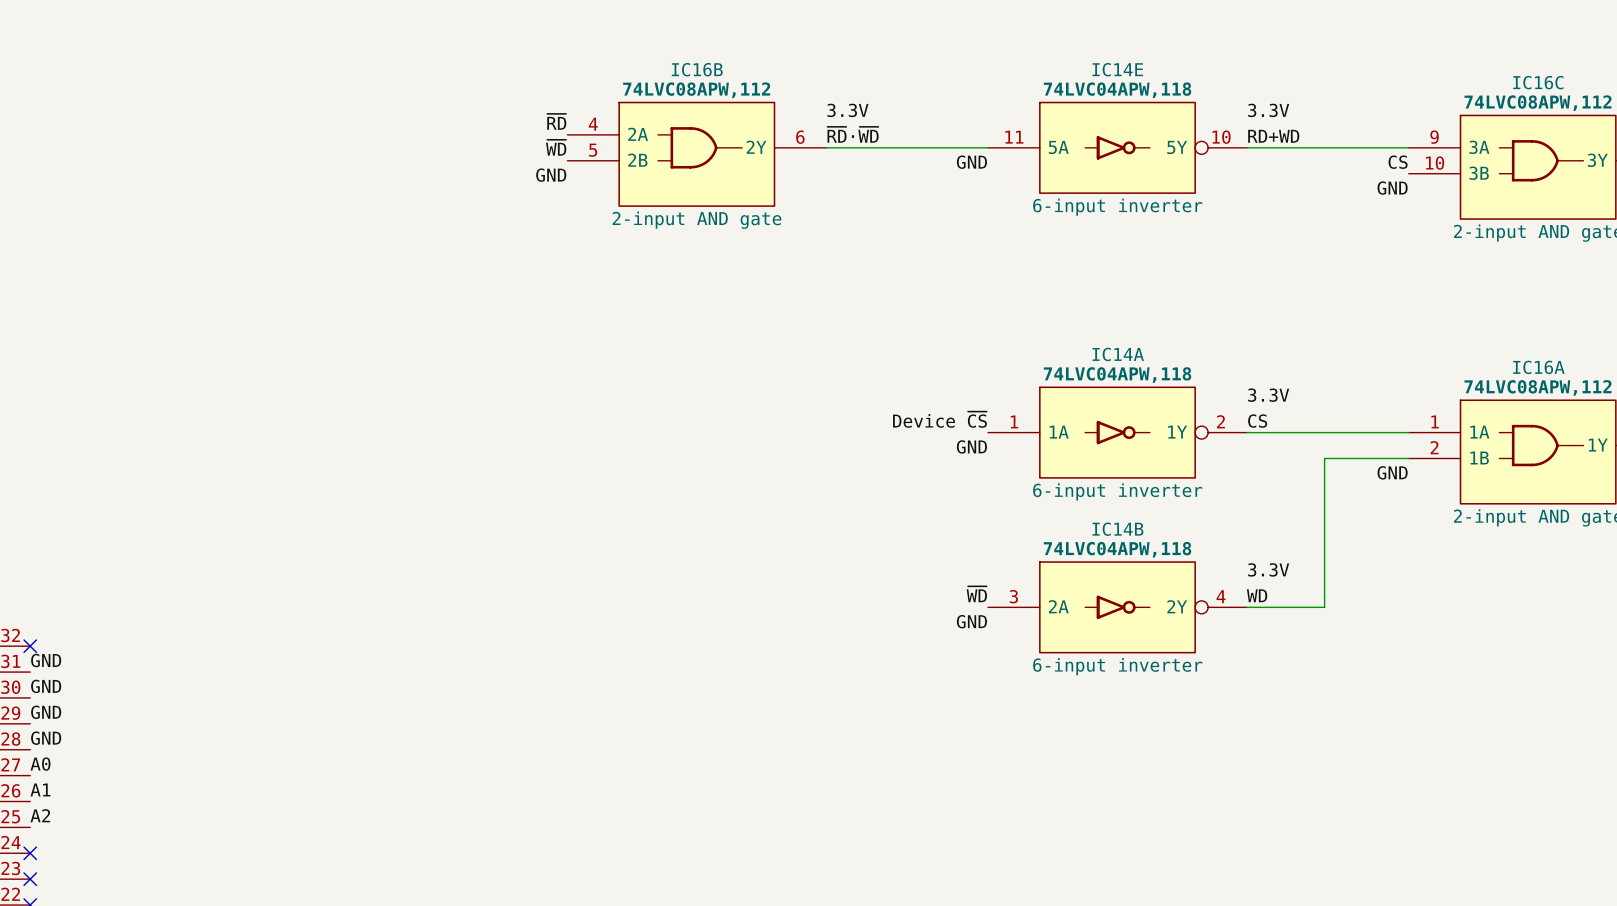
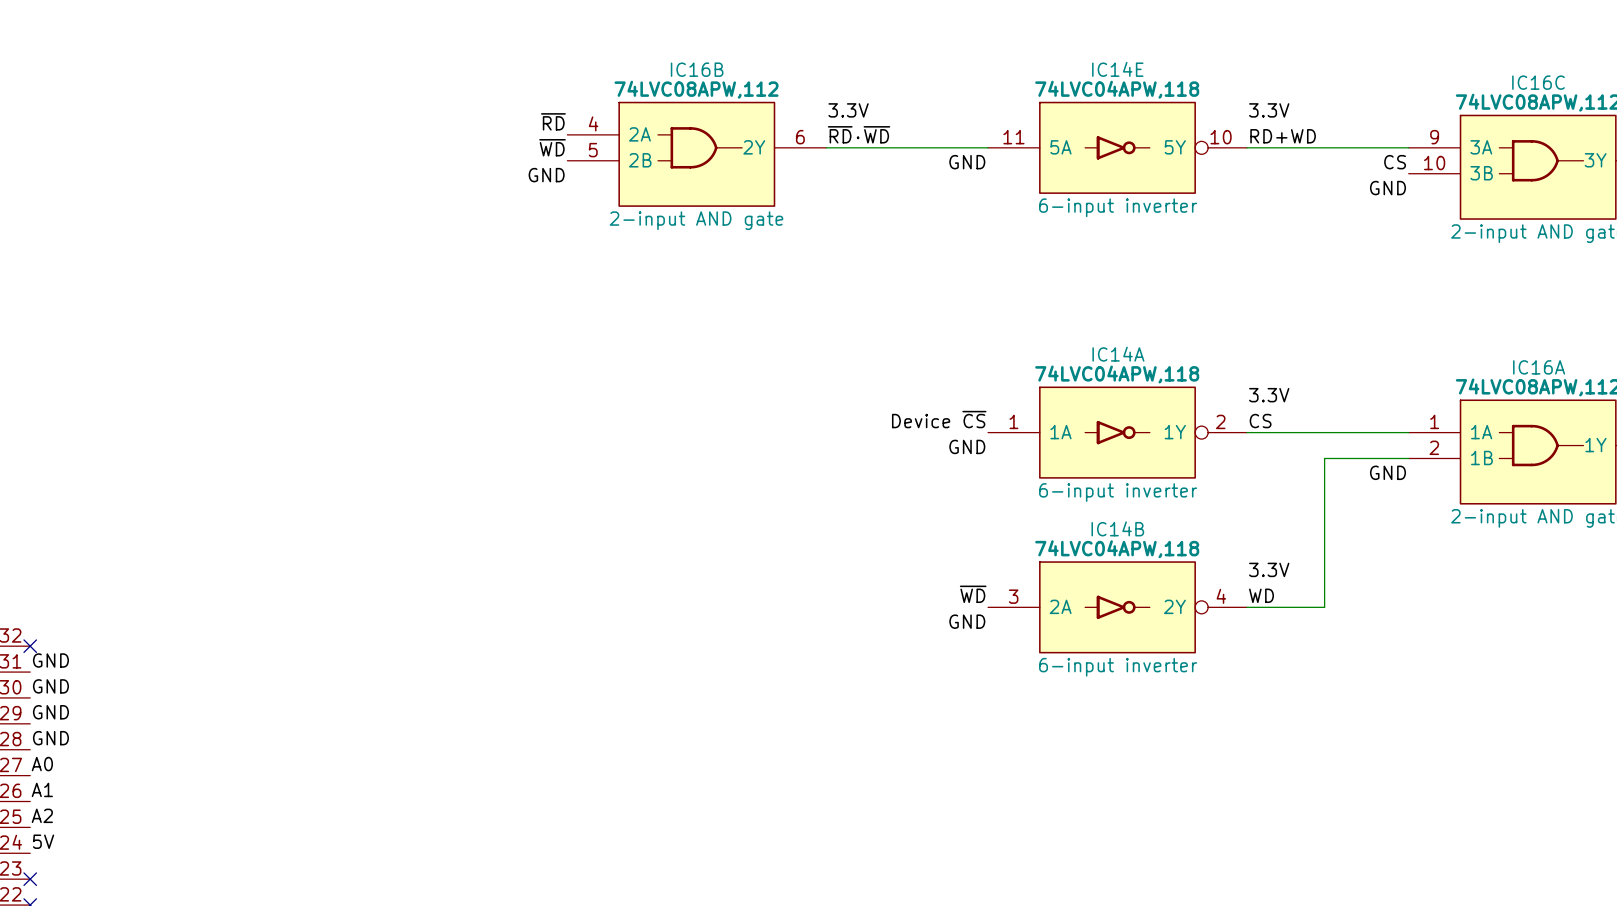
label: none -> 5V (43, 841)
no-connect mark: (30, 853) -> none

